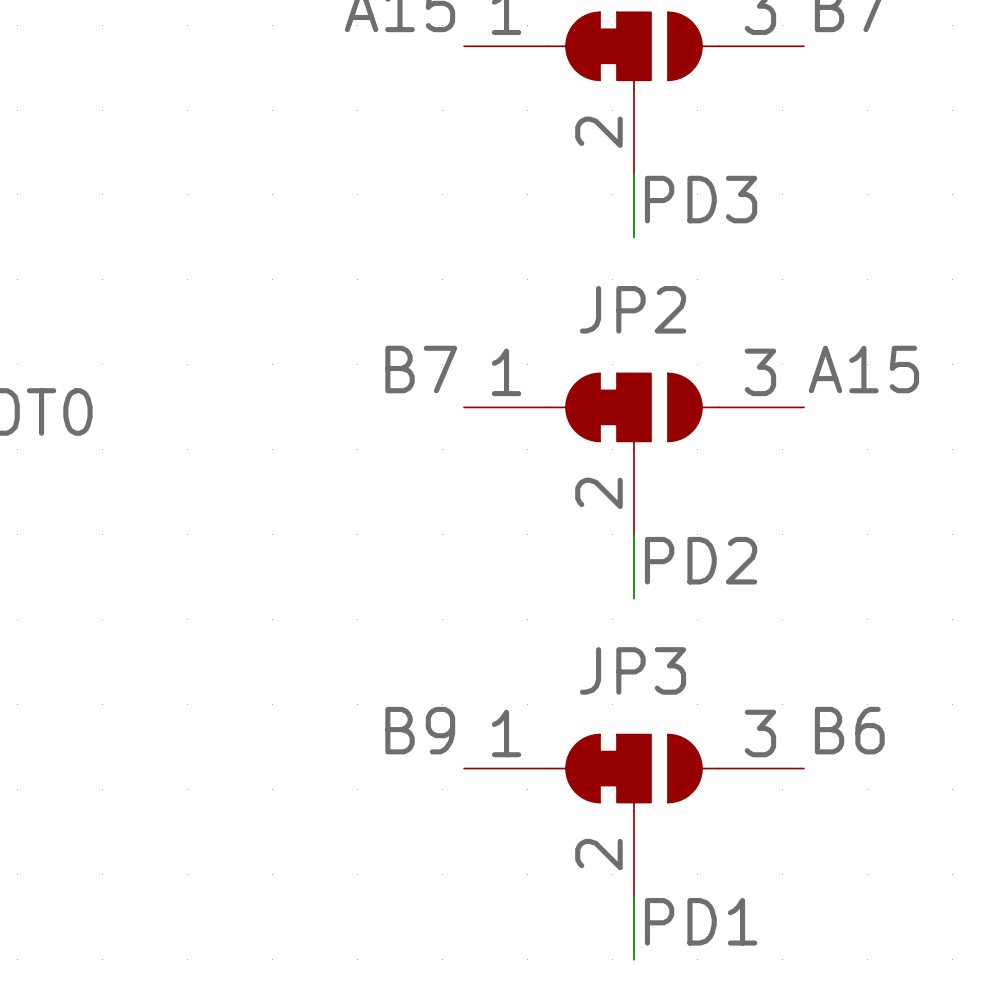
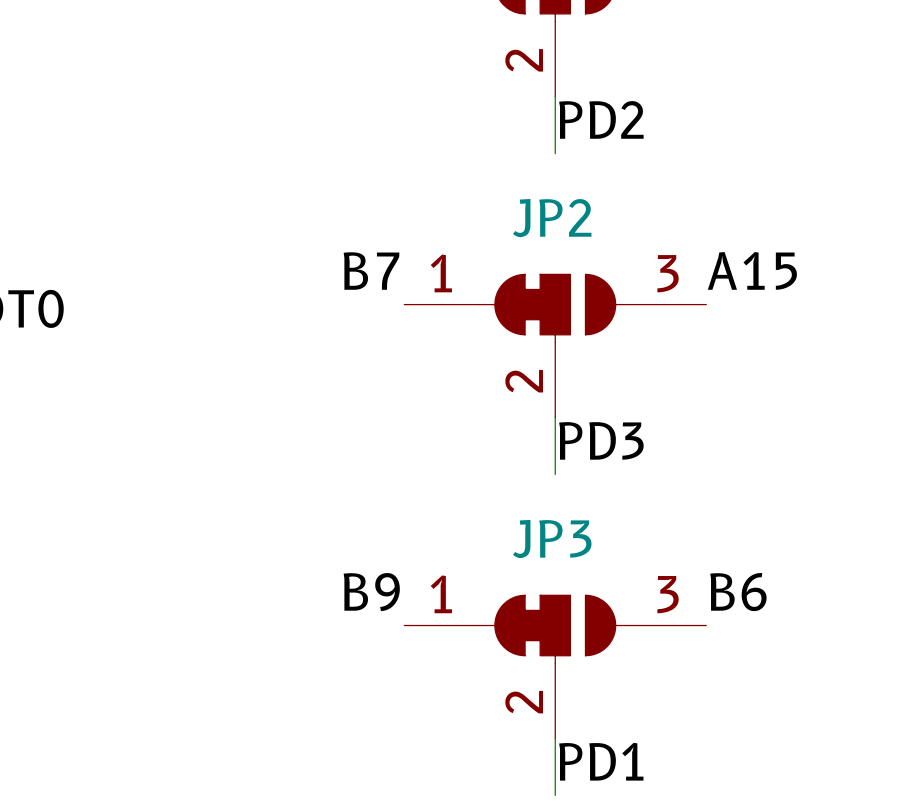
label: PD3 (701, 199) -> PD2 (601, 119)
label: PD2 (701, 560) -> PD3 (601, 440)

